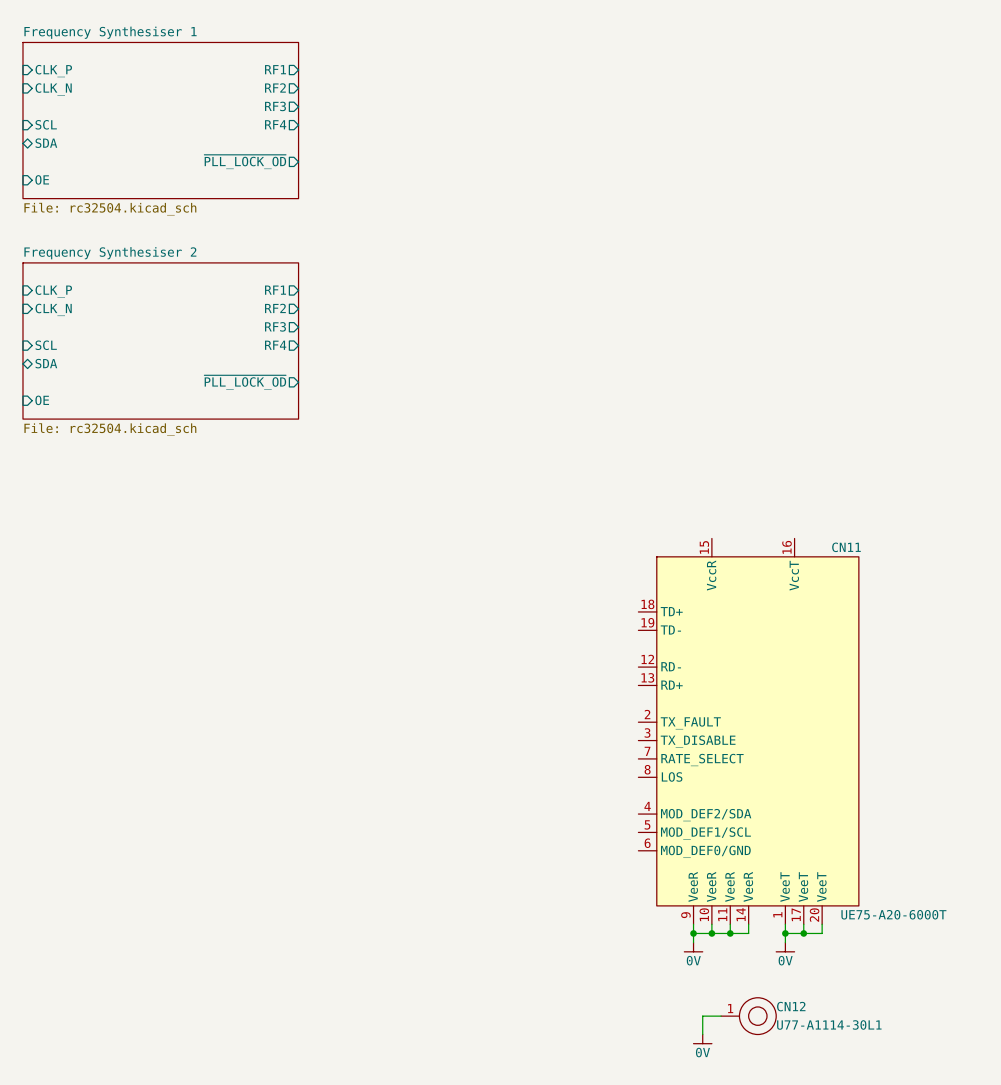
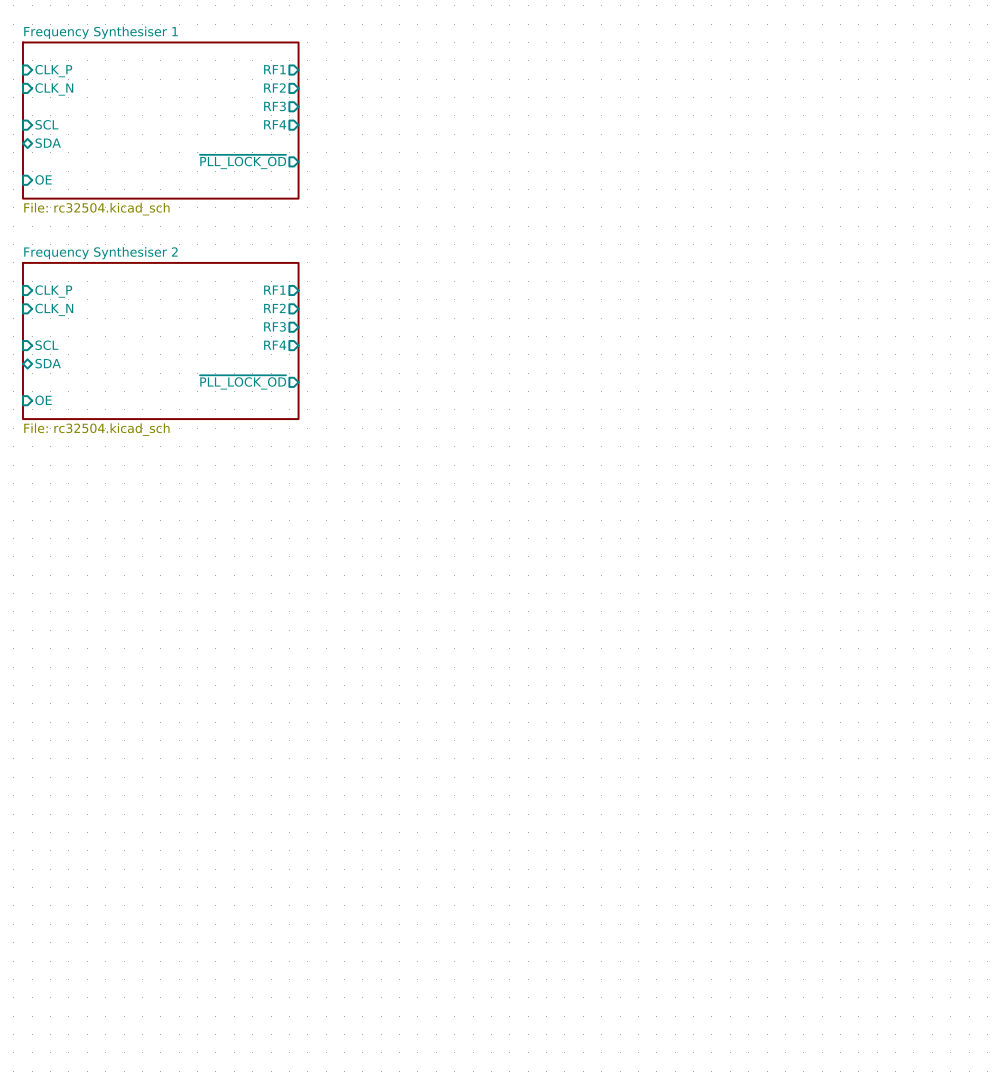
CN11: UE75-A20-6000T (748, 731) -> none
wire: (693, 924) (693, 942) -> none
wire: (711, 924) (711, 933) -> none
wire: (730, 924) (730, 933) -> none
wire: (748, 924) (748, 933) (693, 933) -> none
wire: (785, 924) (785, 942) -> none
wire: (803, 924) (803, 933) -> none
wire: (822, 924) (822, 933) (785, 933) -> none
junction: (693, 933) -> none
junction: (711, 933) -> none
junction: (730, 933) -> none
junction: (785, 933) -> none
junction: (803, 933) -> none
power symbol: 0V (693, 947) -> none
power symbol: 0V (785, 947) -> none
wire: (721, 1016) (702, 1016) (702, 1034) -> none
CN12: U77-A1114-30L1 (748, 1016) -> none
power symbol: 0V (702, 1039) -> none

